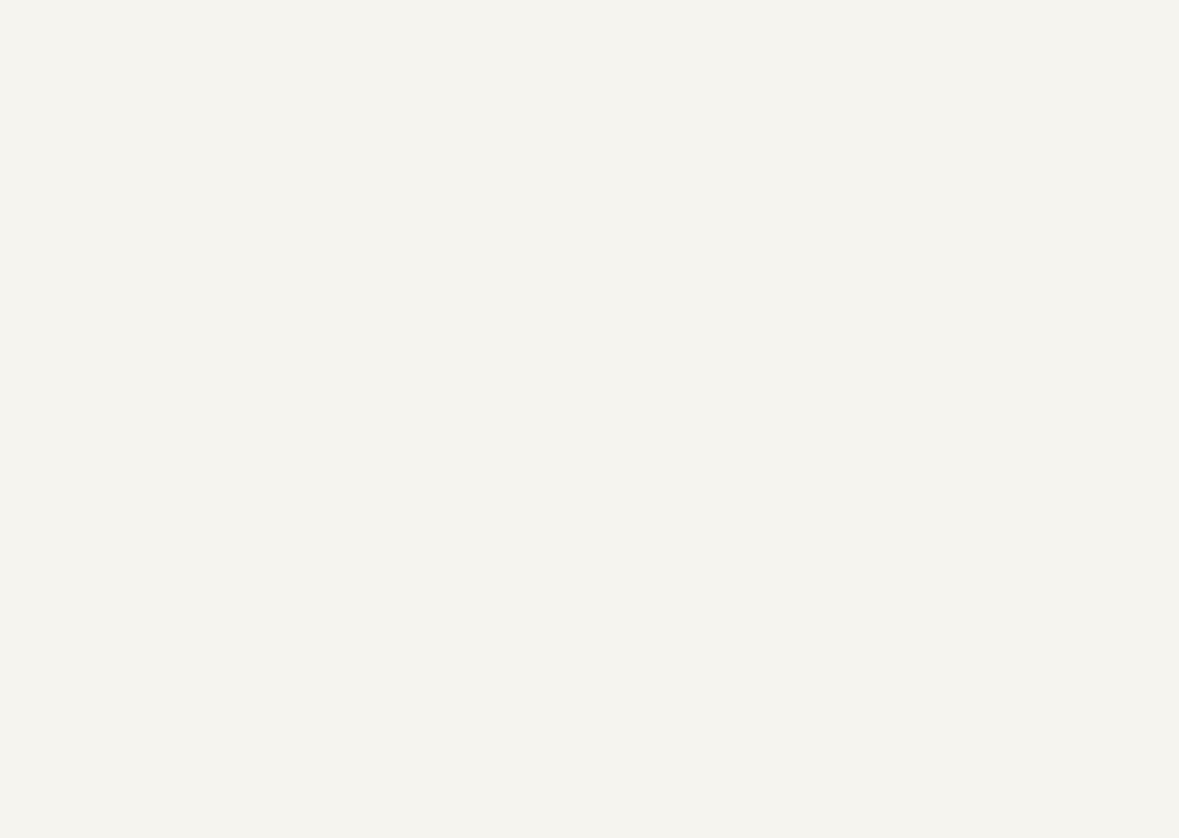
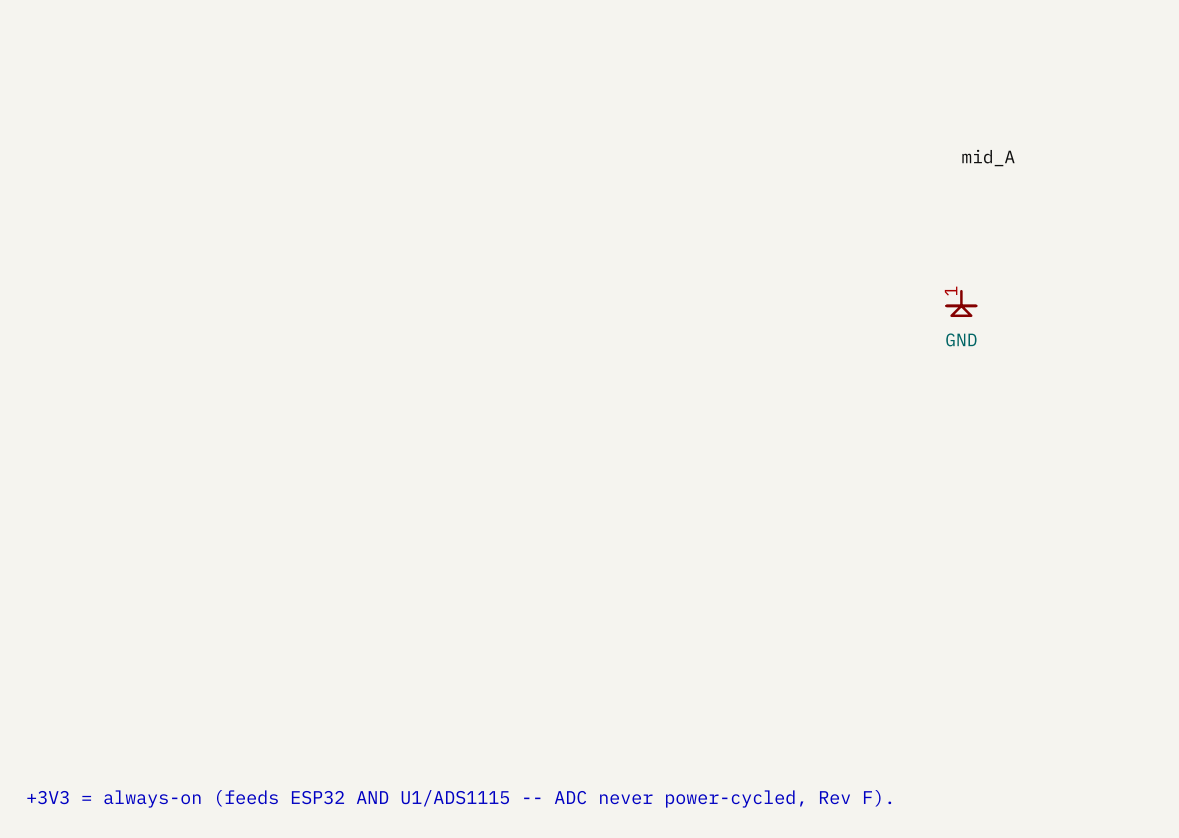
label: none -> mid_A (988, 158)
power symbol: none -> GND (961, 303)
text: none -> +3V3 = always-on (feeds ESP32 AND U1/ADS1115 -- ADC never power-cycled, Rev F). (459, 798)

